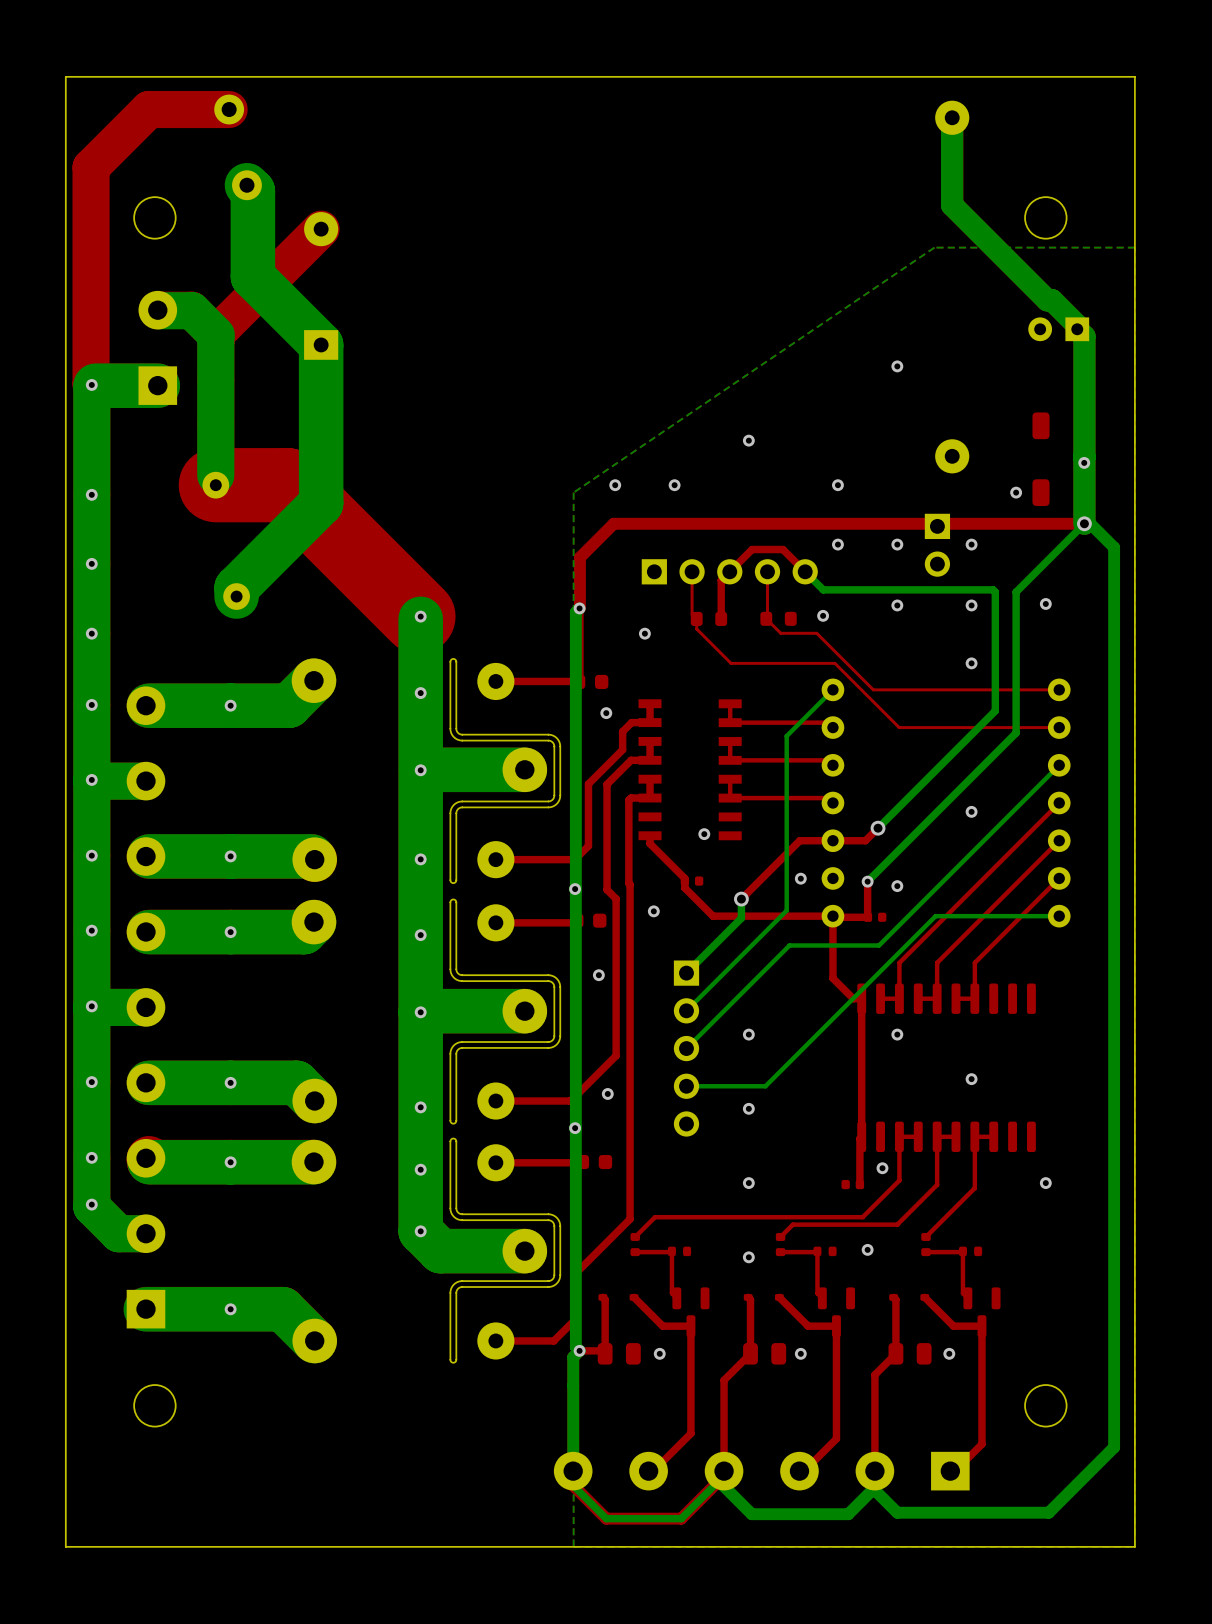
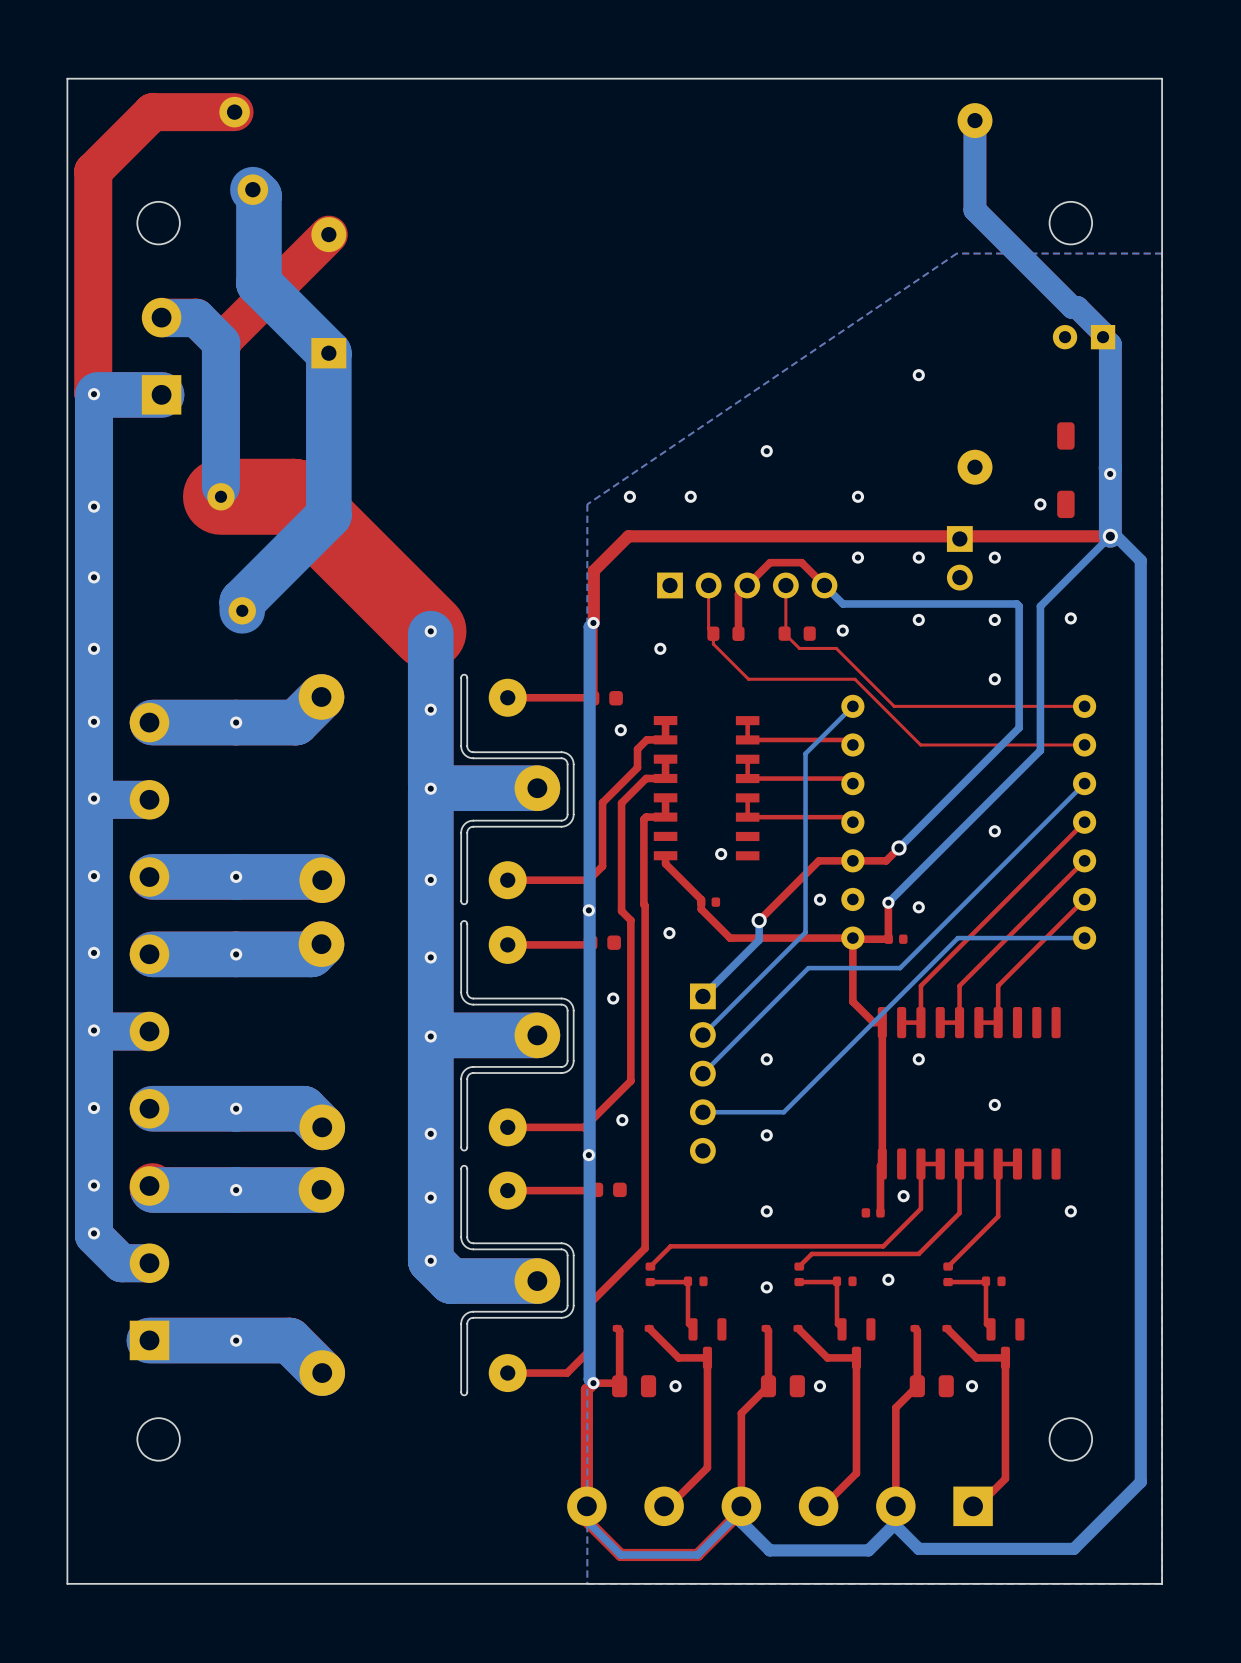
bottom track: (579, 1350) (573, 1357) (573, 1475) -> none

